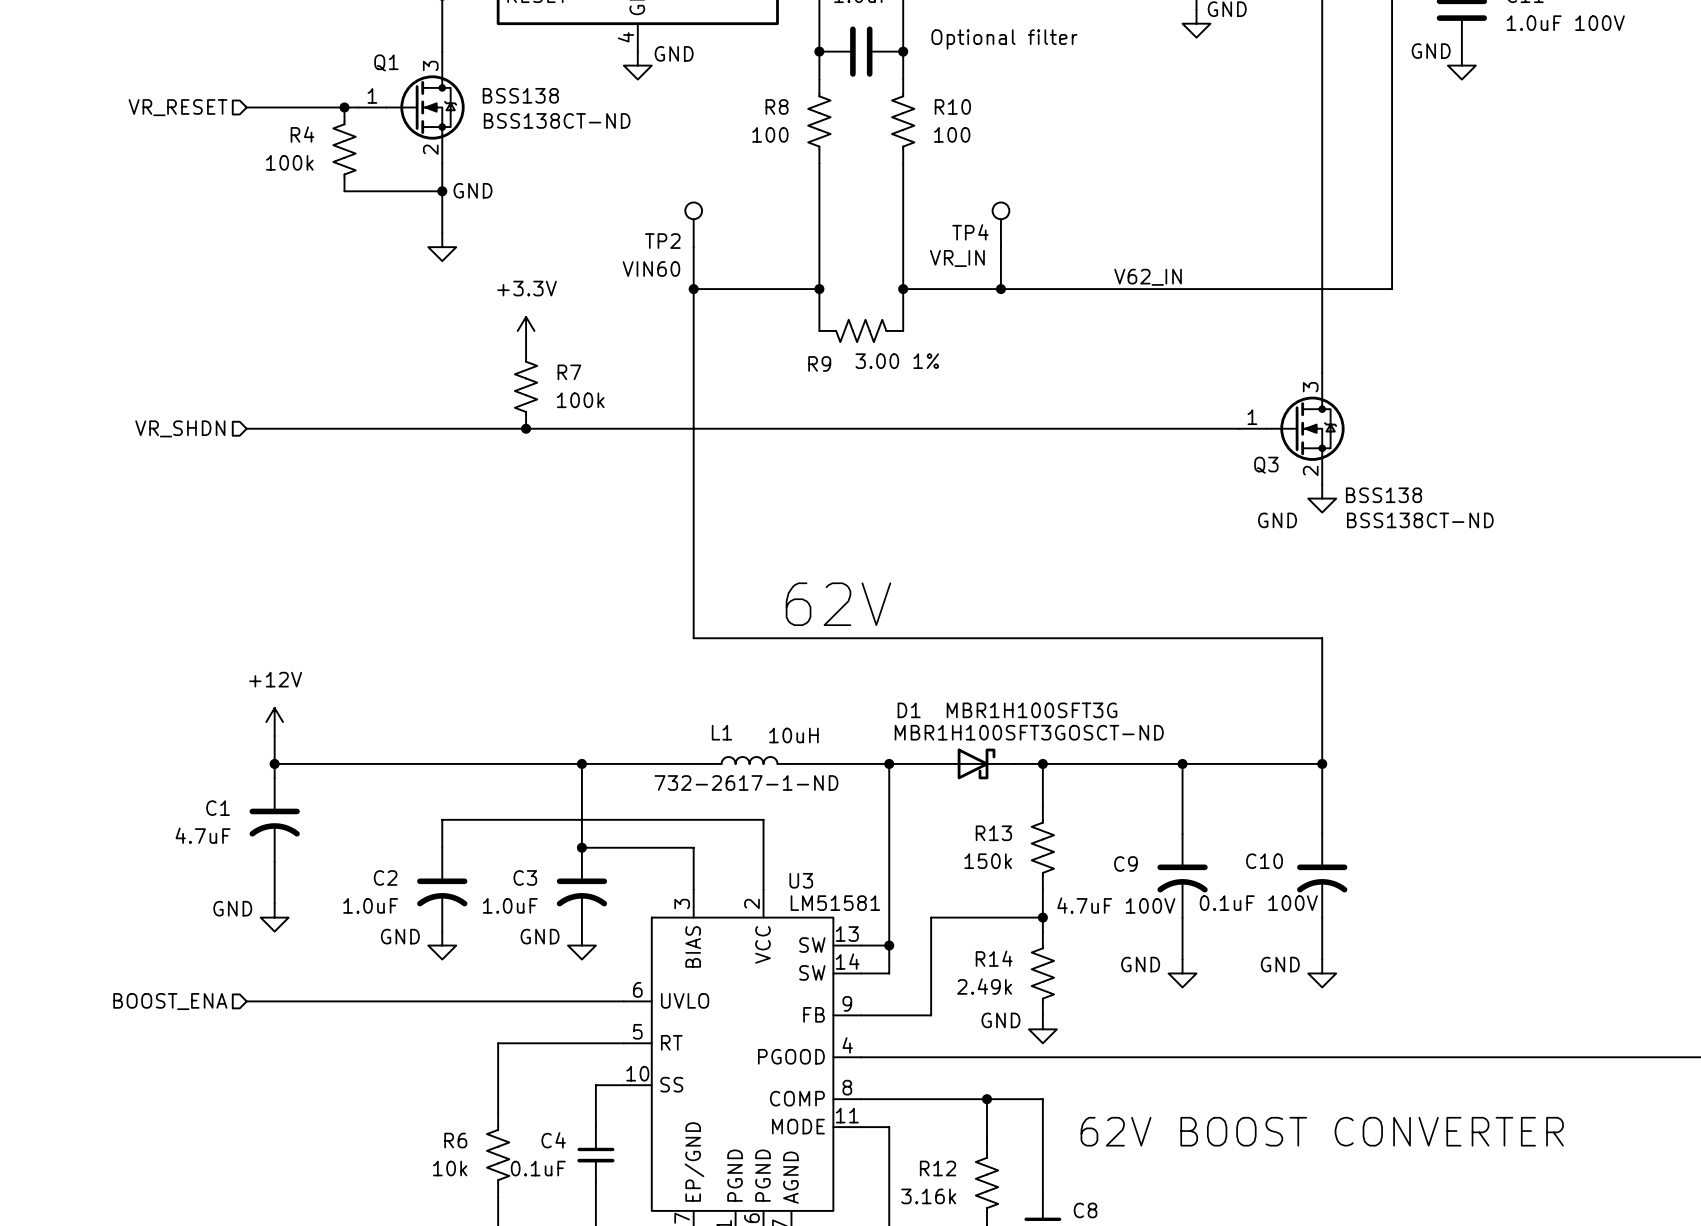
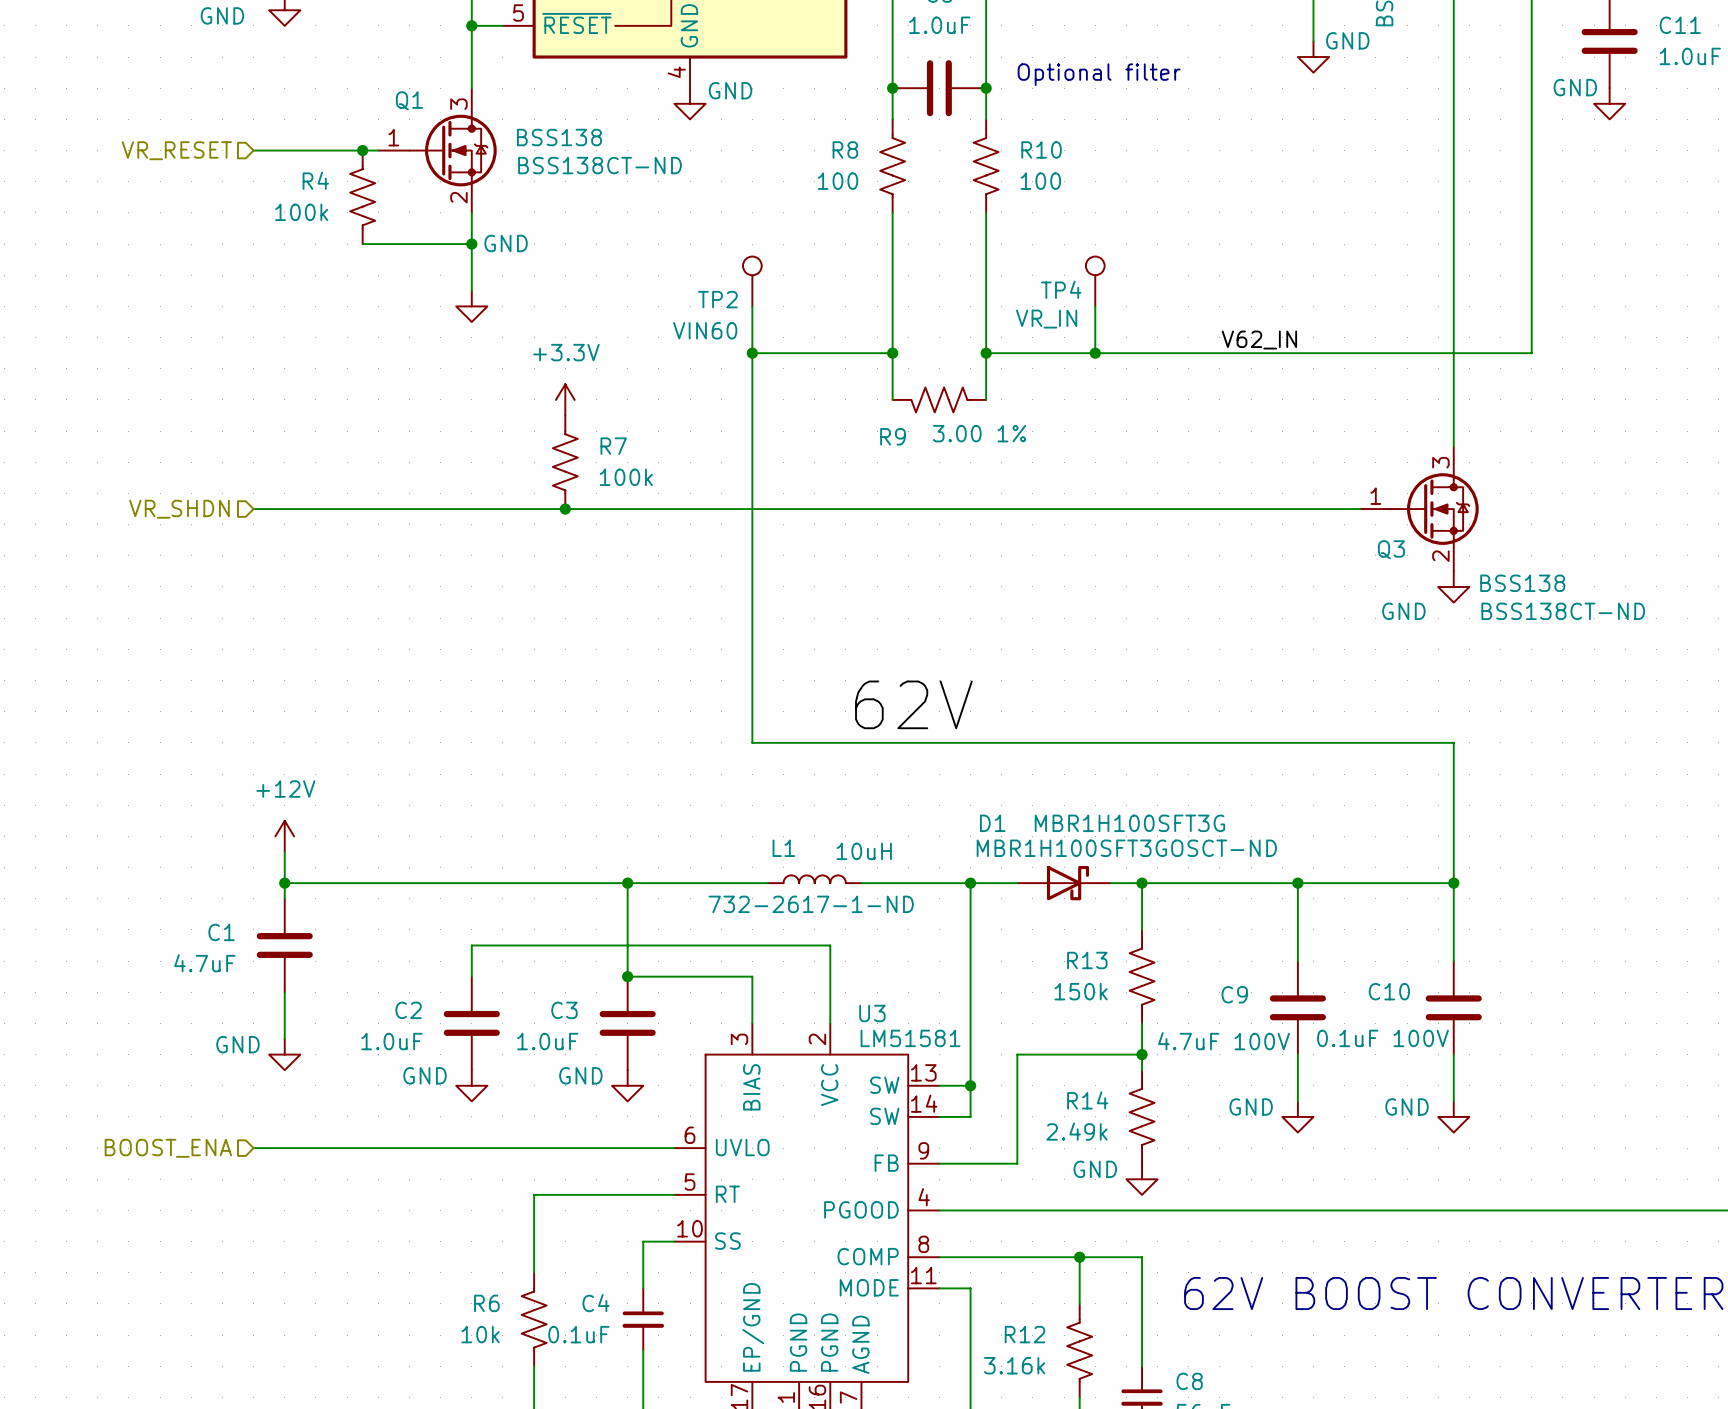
C1 symbol: [249, 777, 300, 862] -> [256, 898, 313, 993]
C9 symbol: [1157, 833, 1208, 918] -> [1269, 961, 1326, 1055]
C10 symbol: [1297, 833, 1348, 918] -> [1425, 961, 1482, 1055]
C2 symbol: [417, 847, 468, 932] -> [443, 976, 500, 1071]
C3 symbol: [556, 847, 608, 932] -> [599, 976, 656, 1071]

